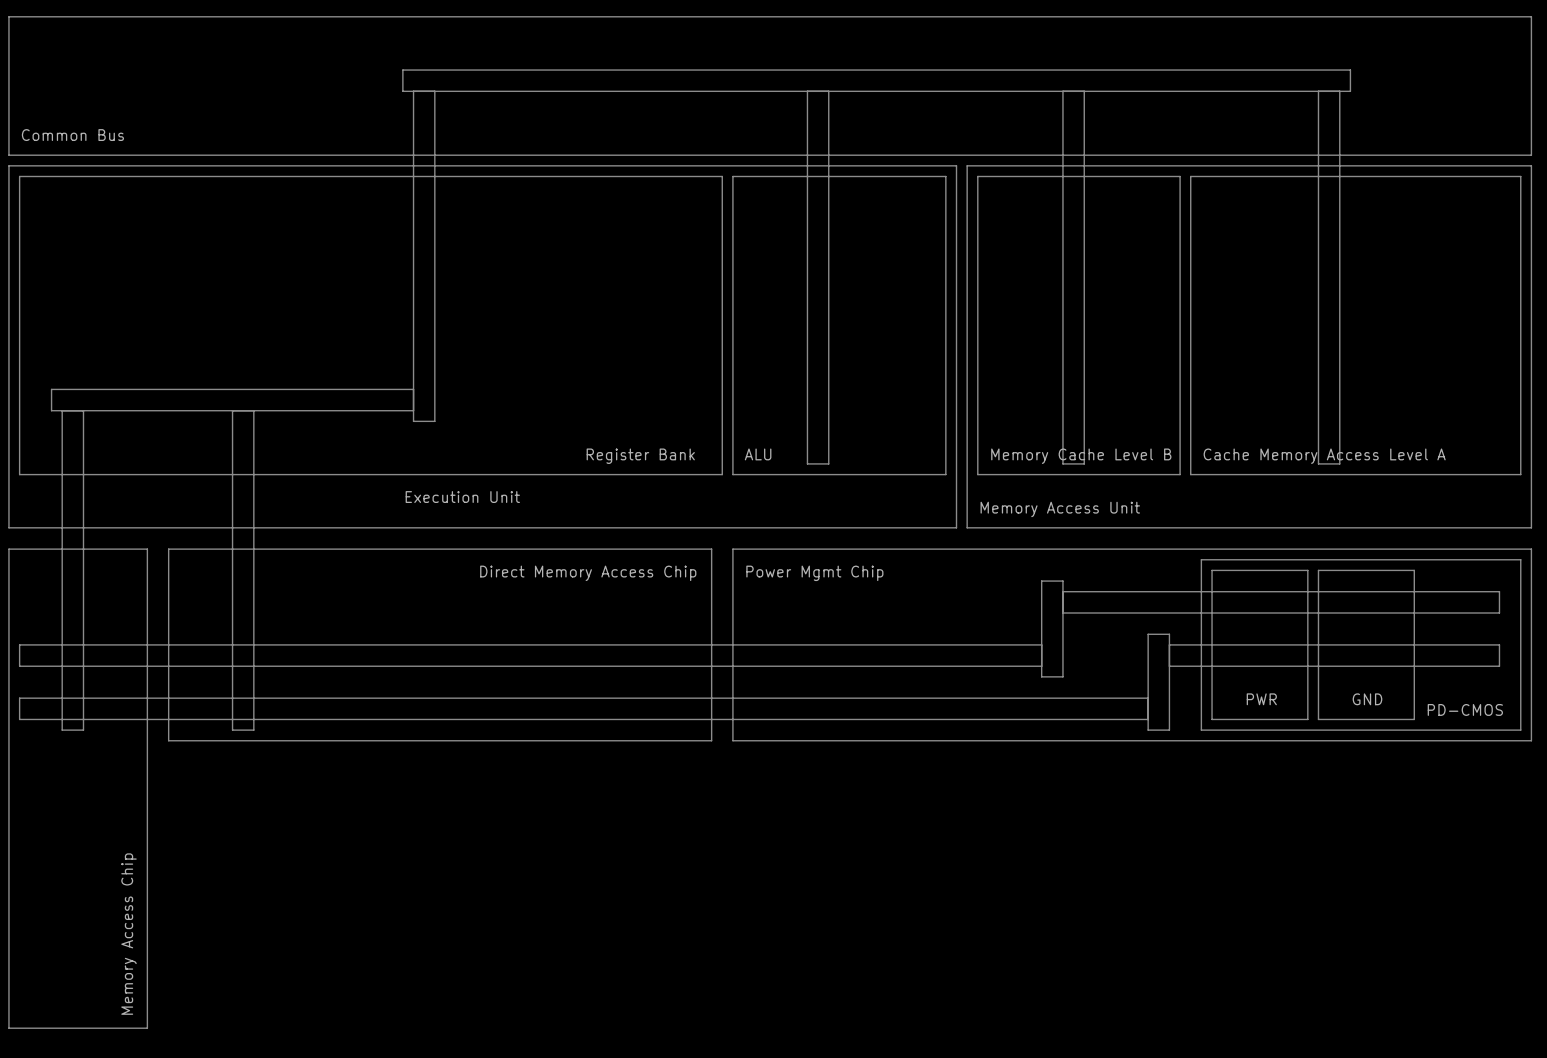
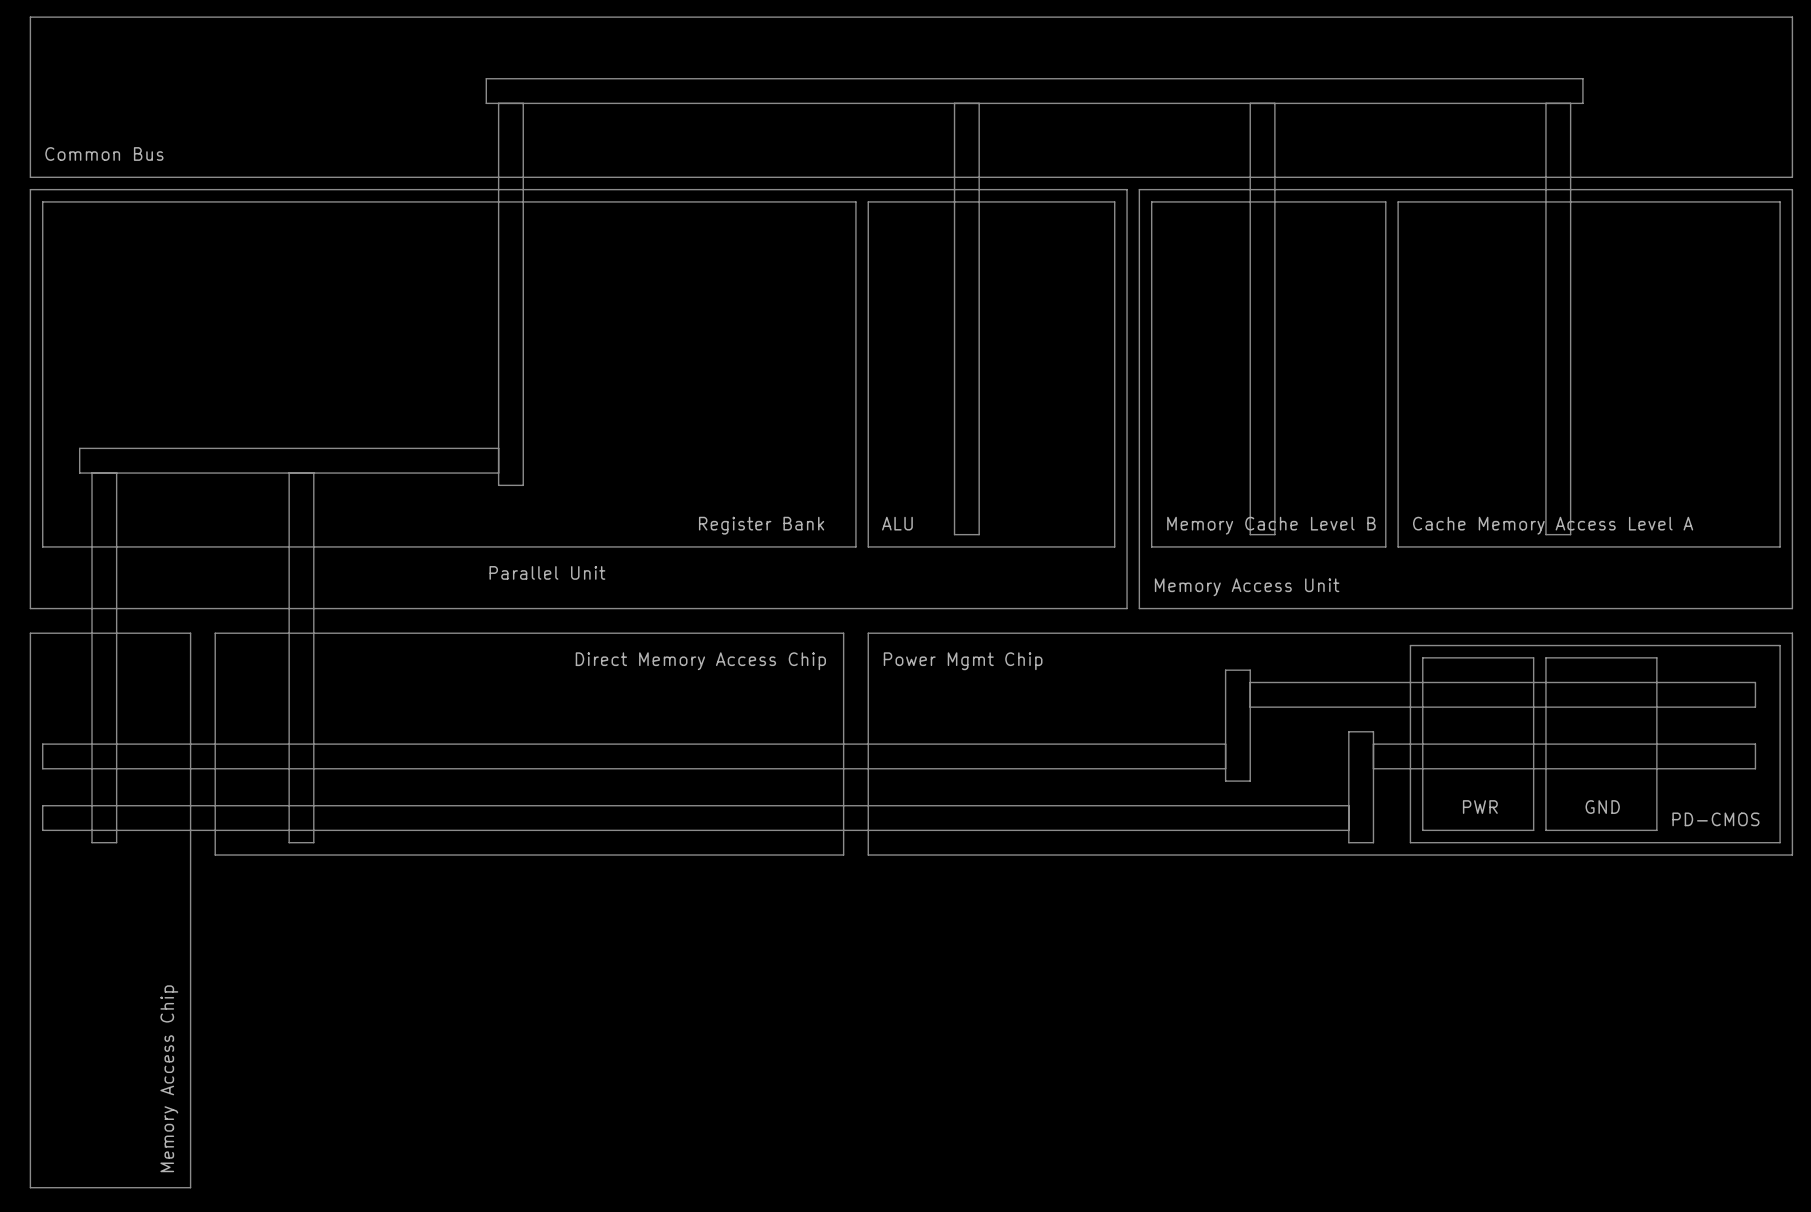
label: Execution Unit (462, 497) -> Parallel Unit (547, 572)

